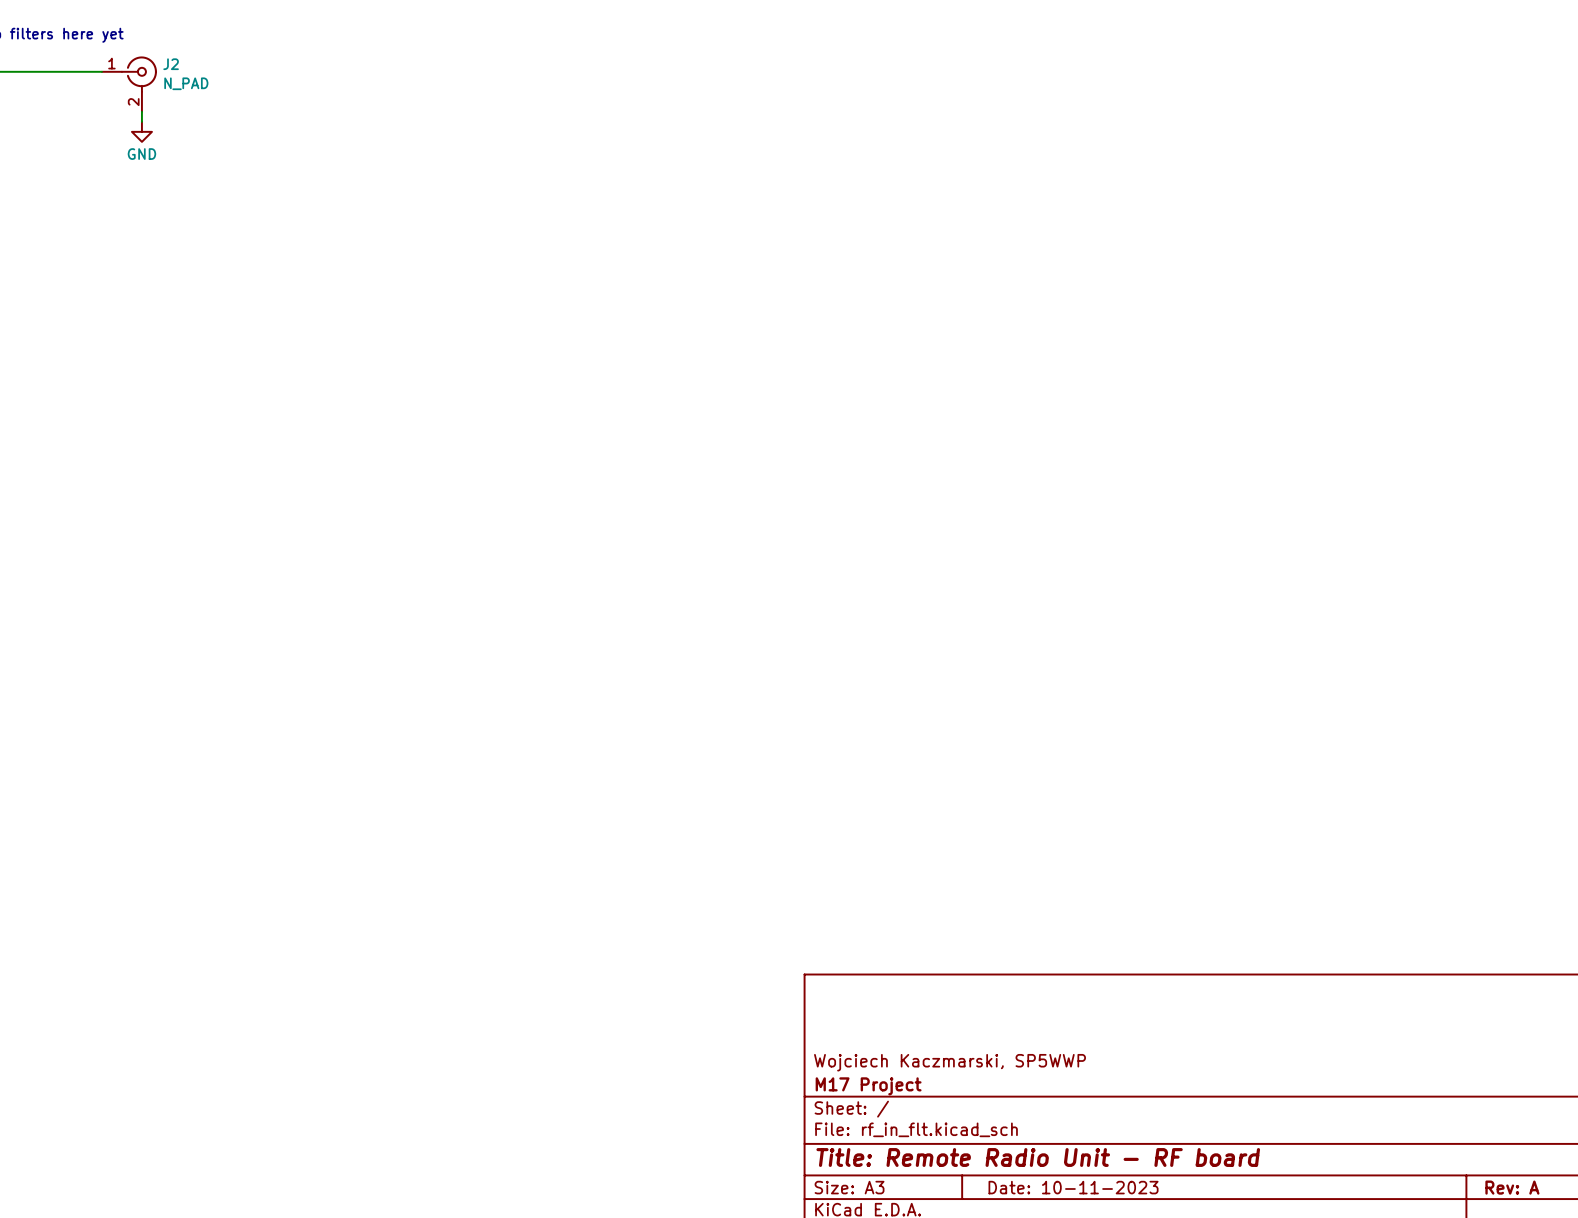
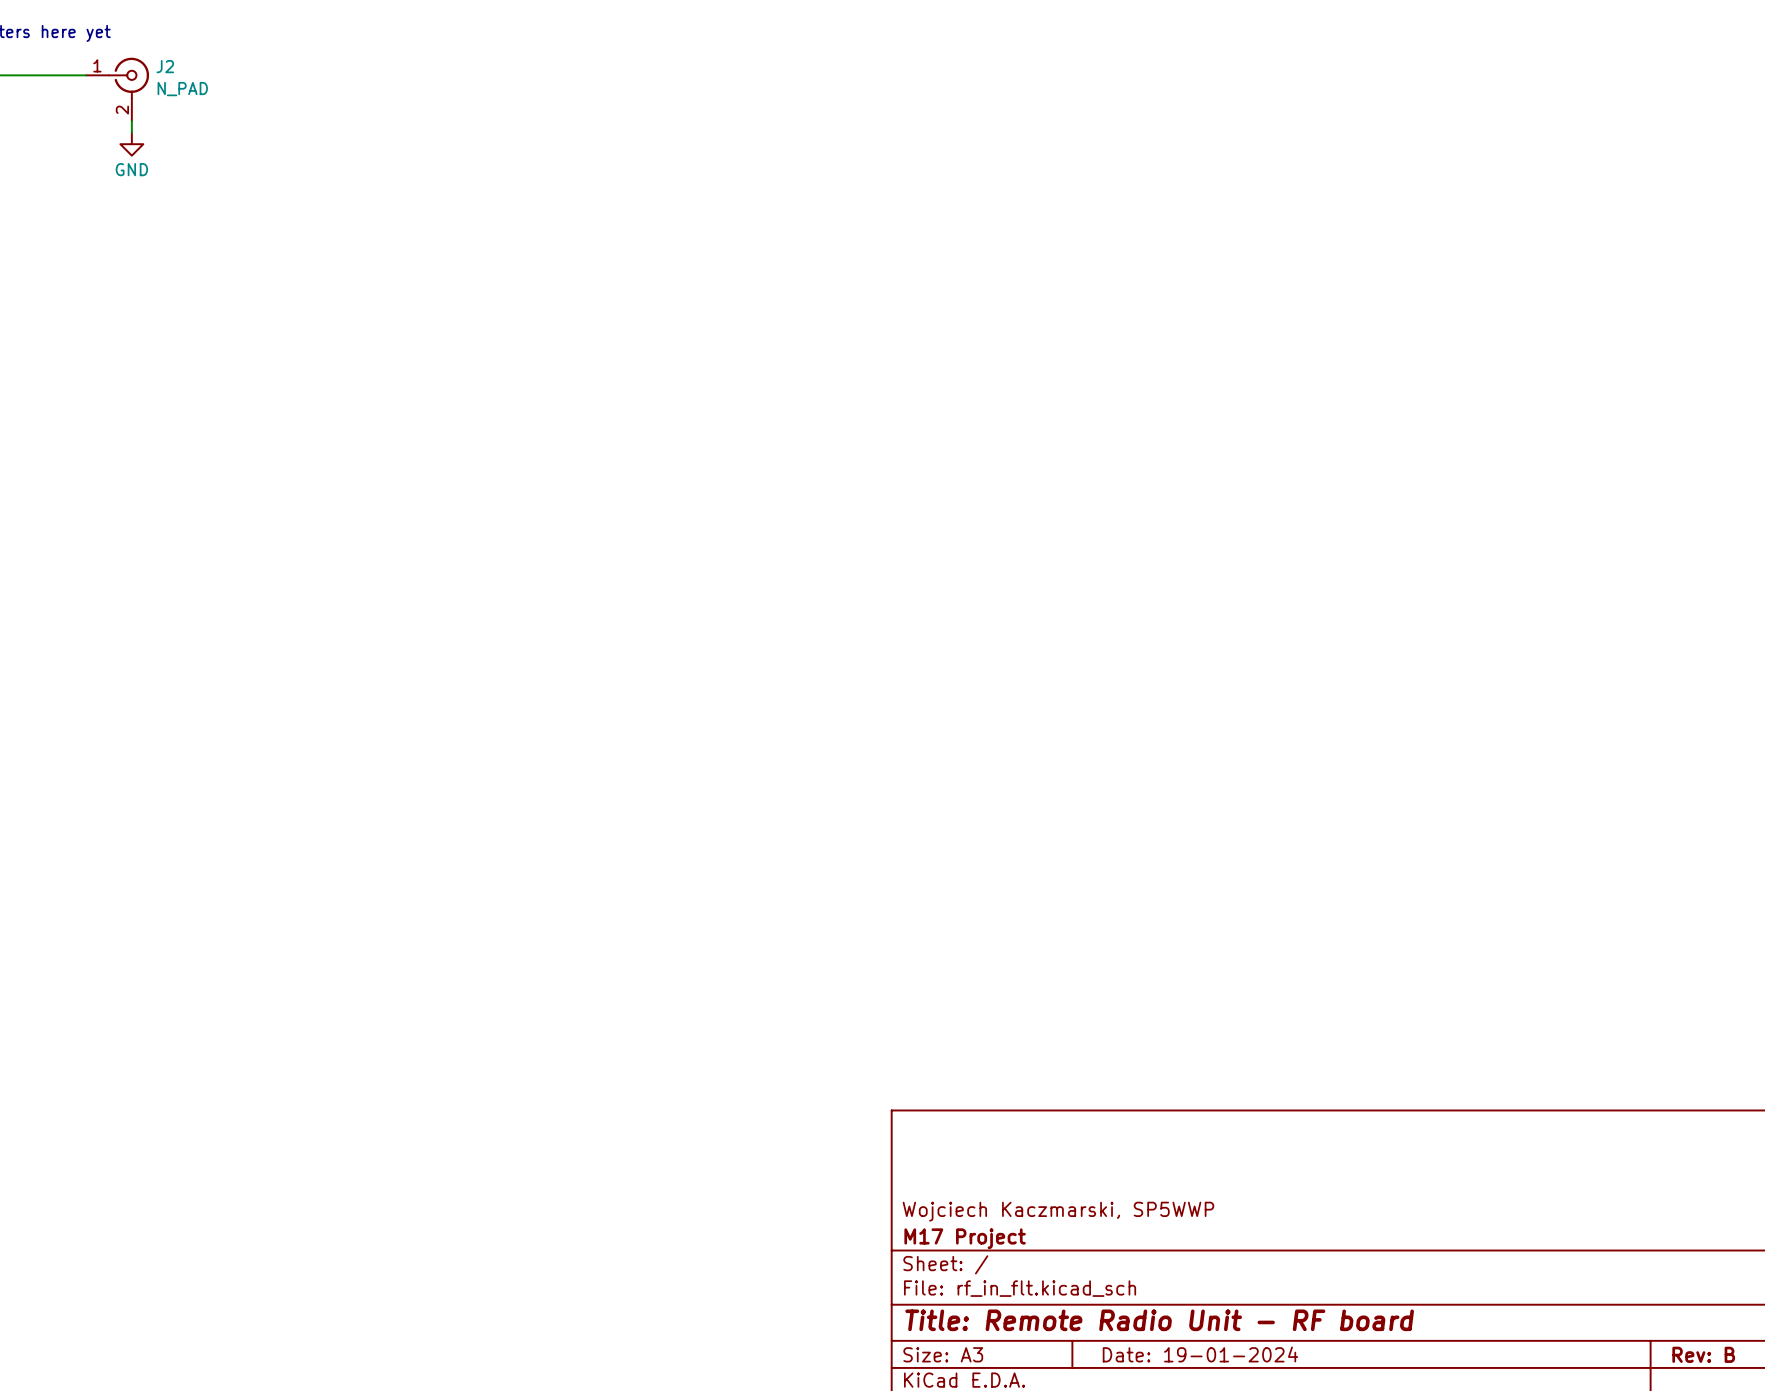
title block: Date: 10-11-2023 (1073, 1187) -> Date: 19-01-2024 (1200, 1354)
title block: Rev: A (1512, 1187) -> Rev: B (1703, 1354)

